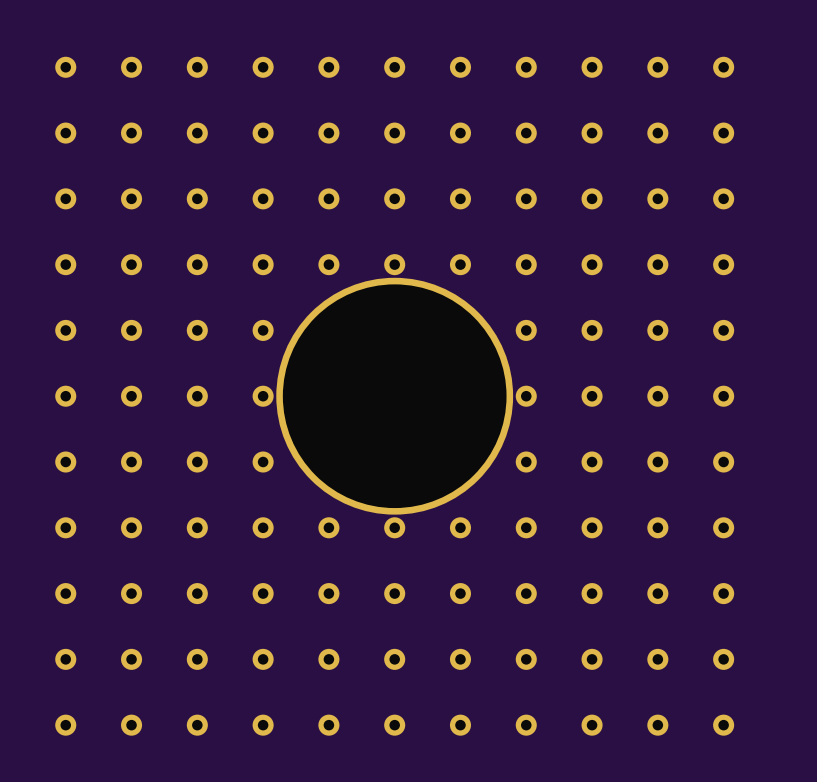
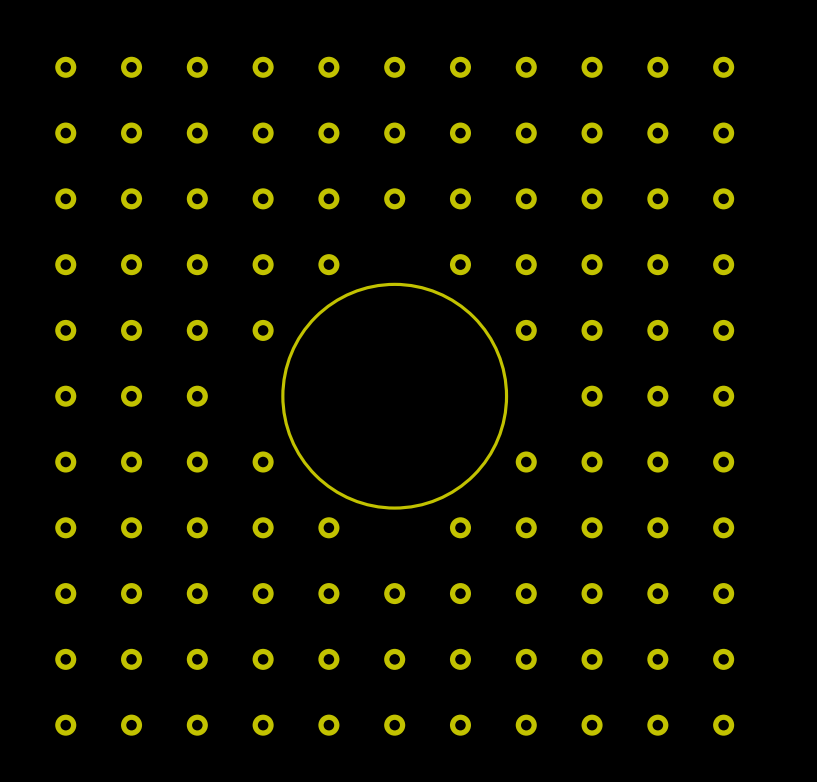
part footprint: [55, 56, 735, 736] -> [55, 56, 735, 736]

